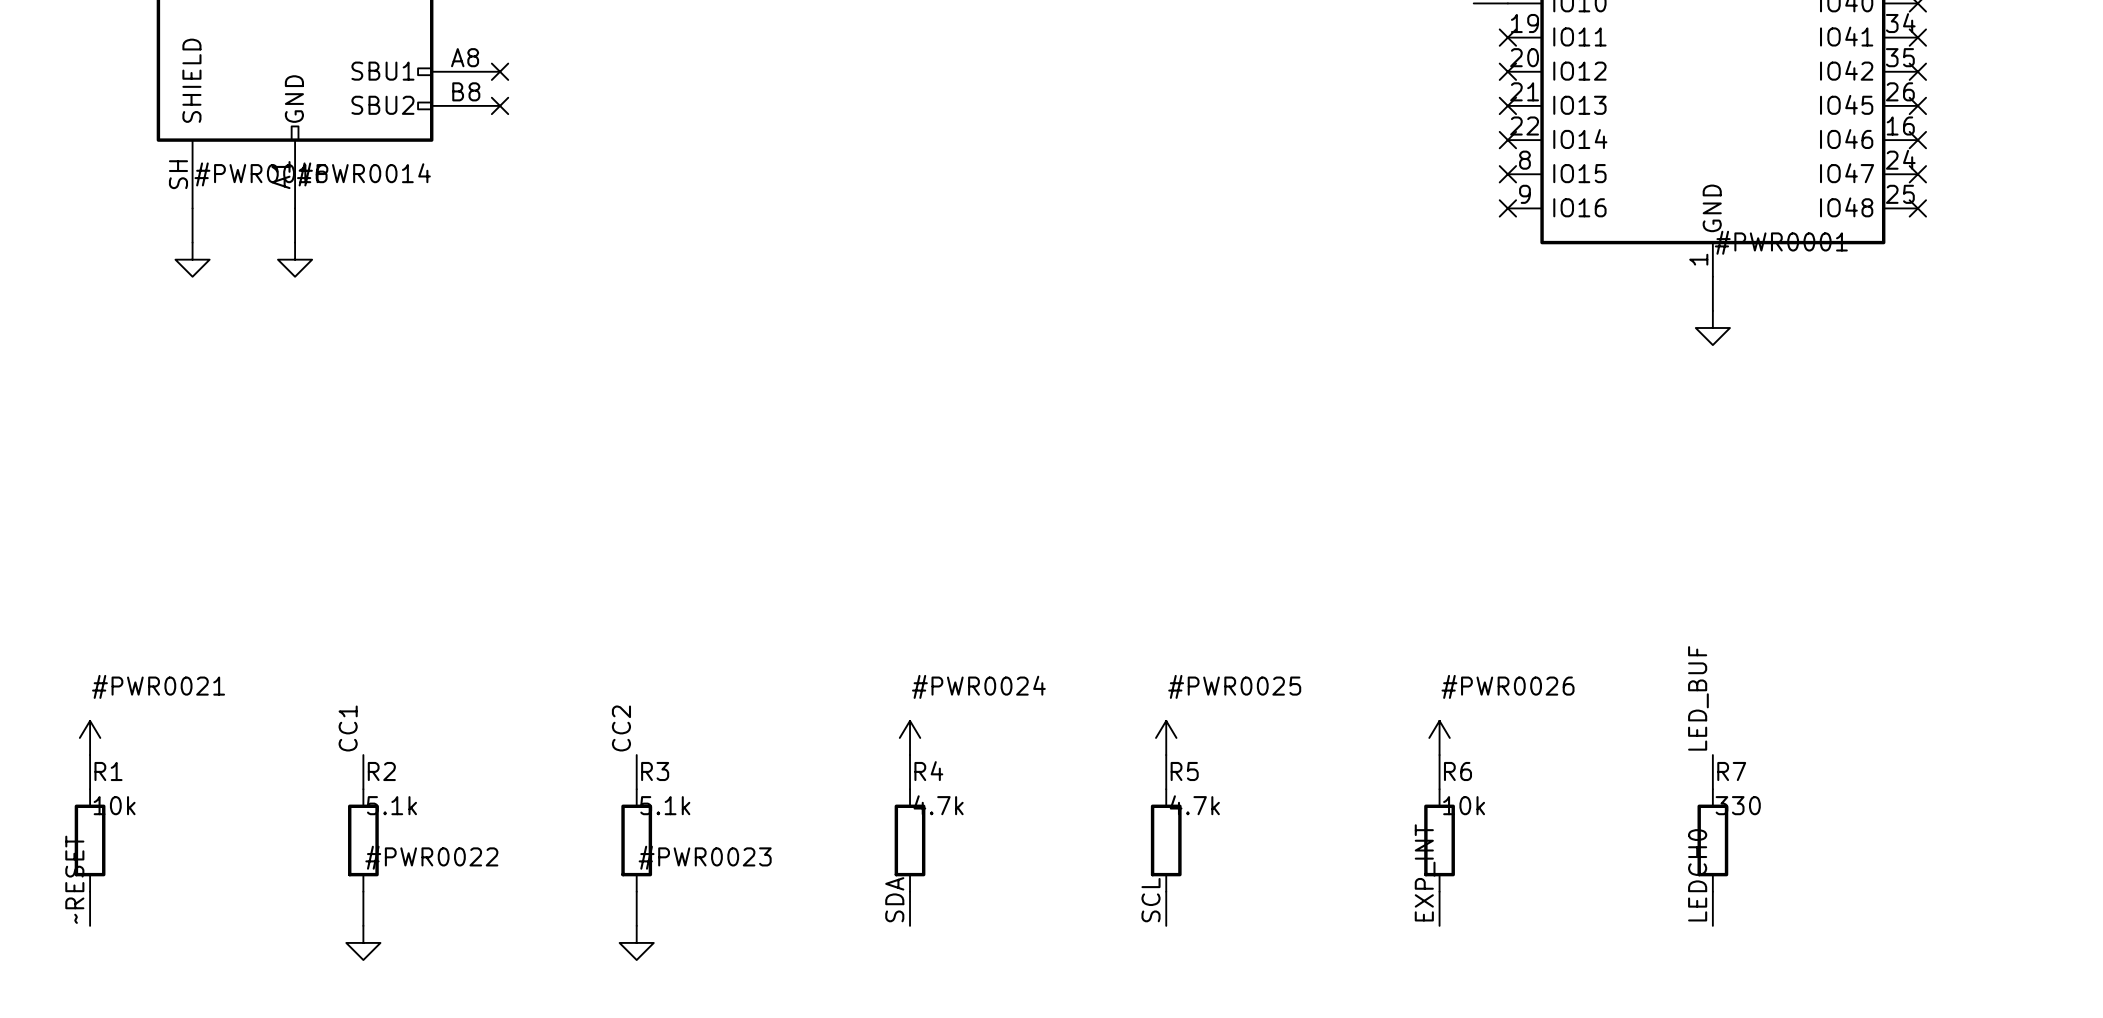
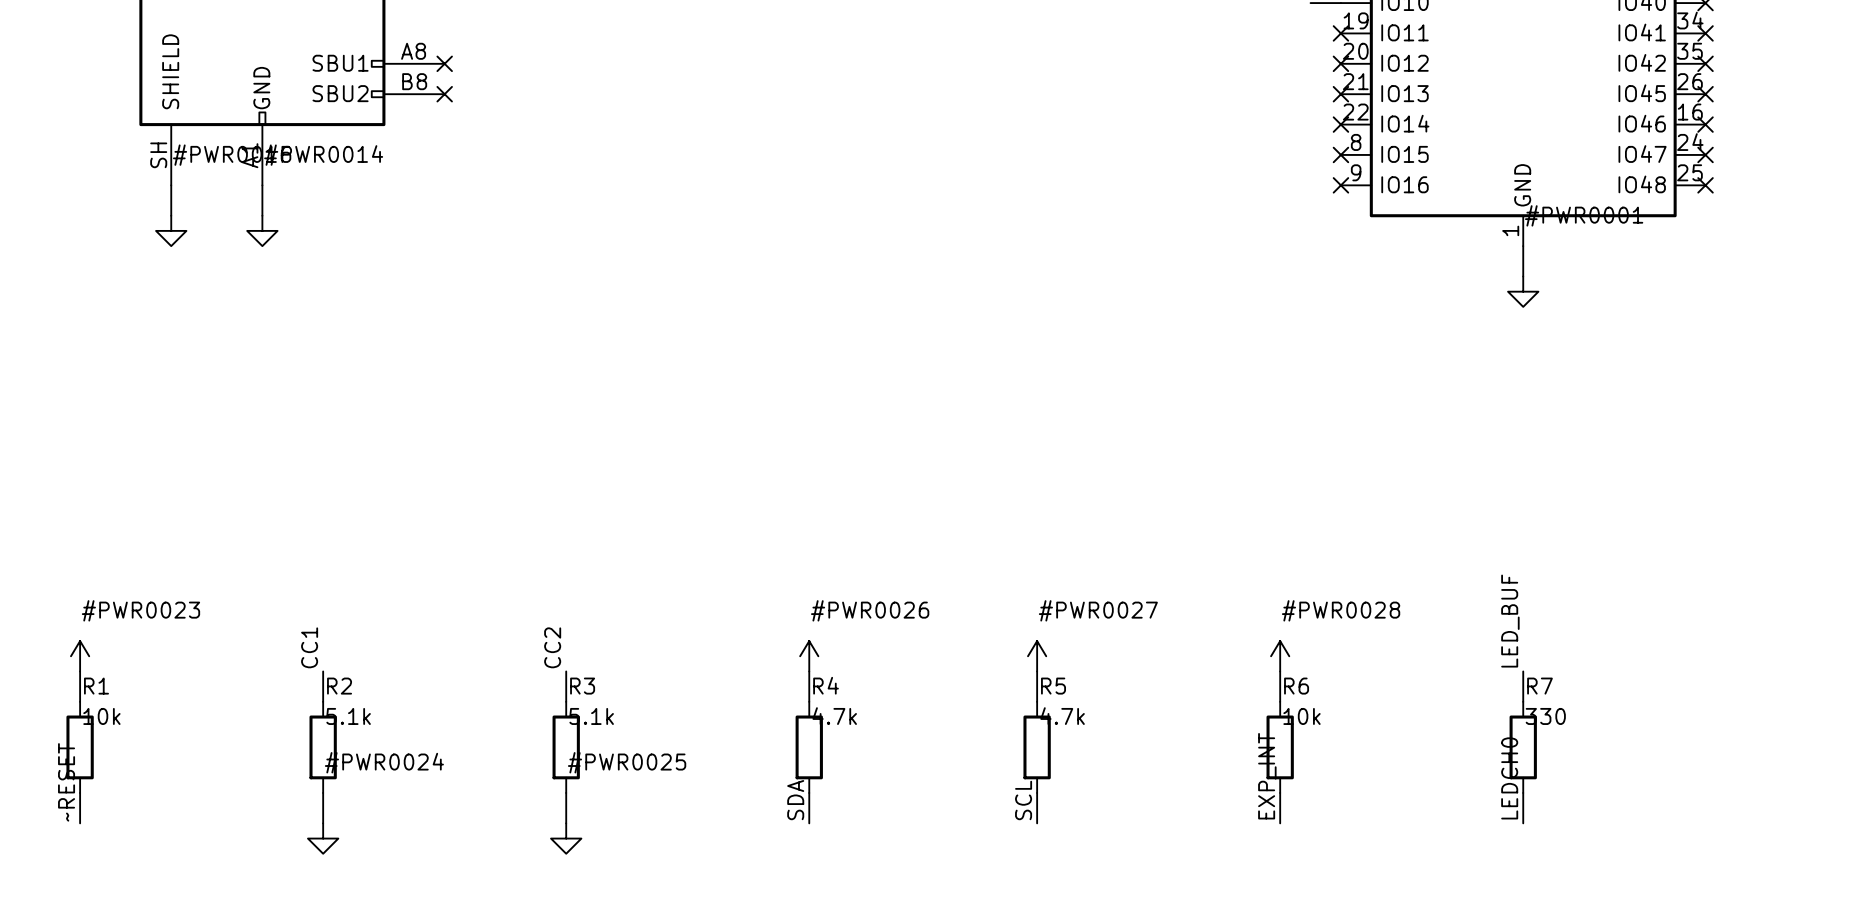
#PWR0021 name: #PWR0021 (158, 686) -> #PWR0023 (140, 610)
#PWR0024 name: #PWR0024 (978, 686) -> #PWR0026 (870, 610)
#PWR0025 name: #PWR0025 (1234, 686) -> #PWR0027 (1098, 610)
#PWR0026 name: #PWR0026 (1508, 686) -> #PWR0028 (1341, 610)
#PWR0022 name: #PWR0022 (431, 857) -> #PWR0024 (384, 762)
#PWR0023 name: #PWR0023 (705, 857) -> #PWR0025 (627, 762)

